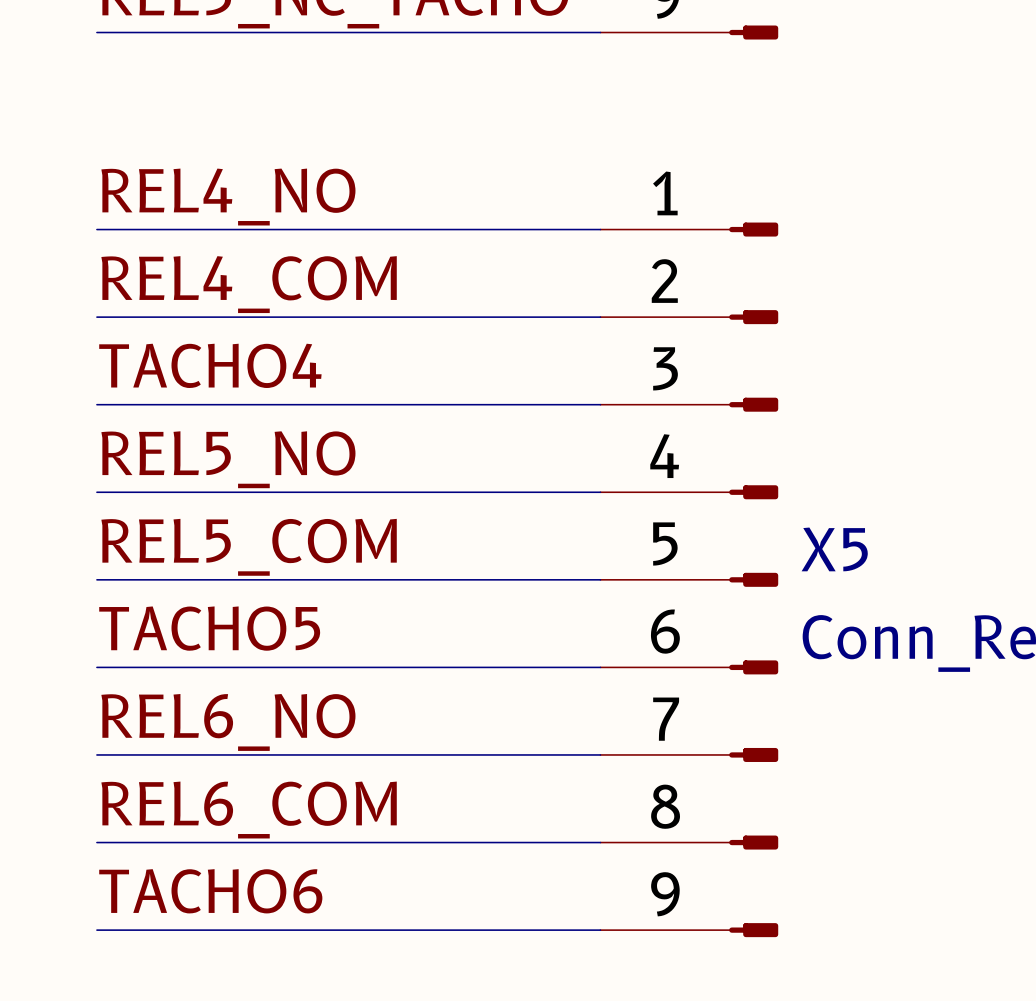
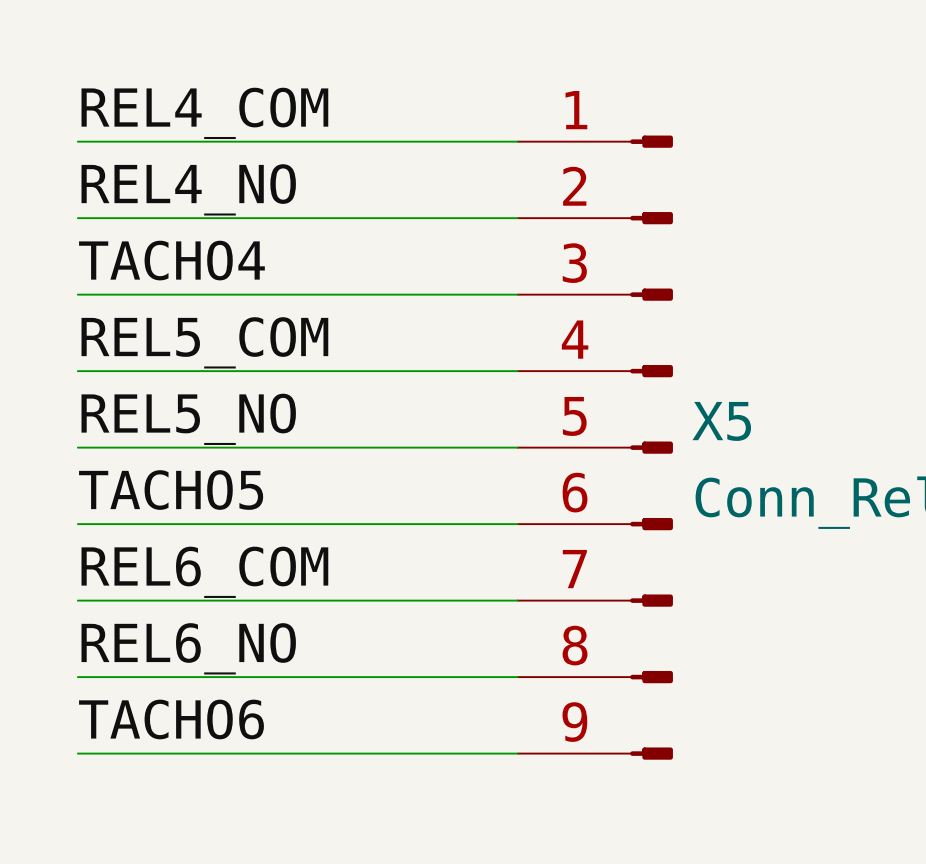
label: REL4_NO (228, 197) -> REL4_COM (204, 113)
label: REL4_COM (249, 284) -> REL4_NO (188, 189)
label: REL5_NO (228, 459) -> REL5_COM (204, 342)
label: REL5_COM (249, 547) -> REL5_NO (188, 419)
label: REL6_NO (228, 722) -> REL6_COM (204, 572)
label: REL6_COM (249, 810) -> REL6_NO (188, 648)

